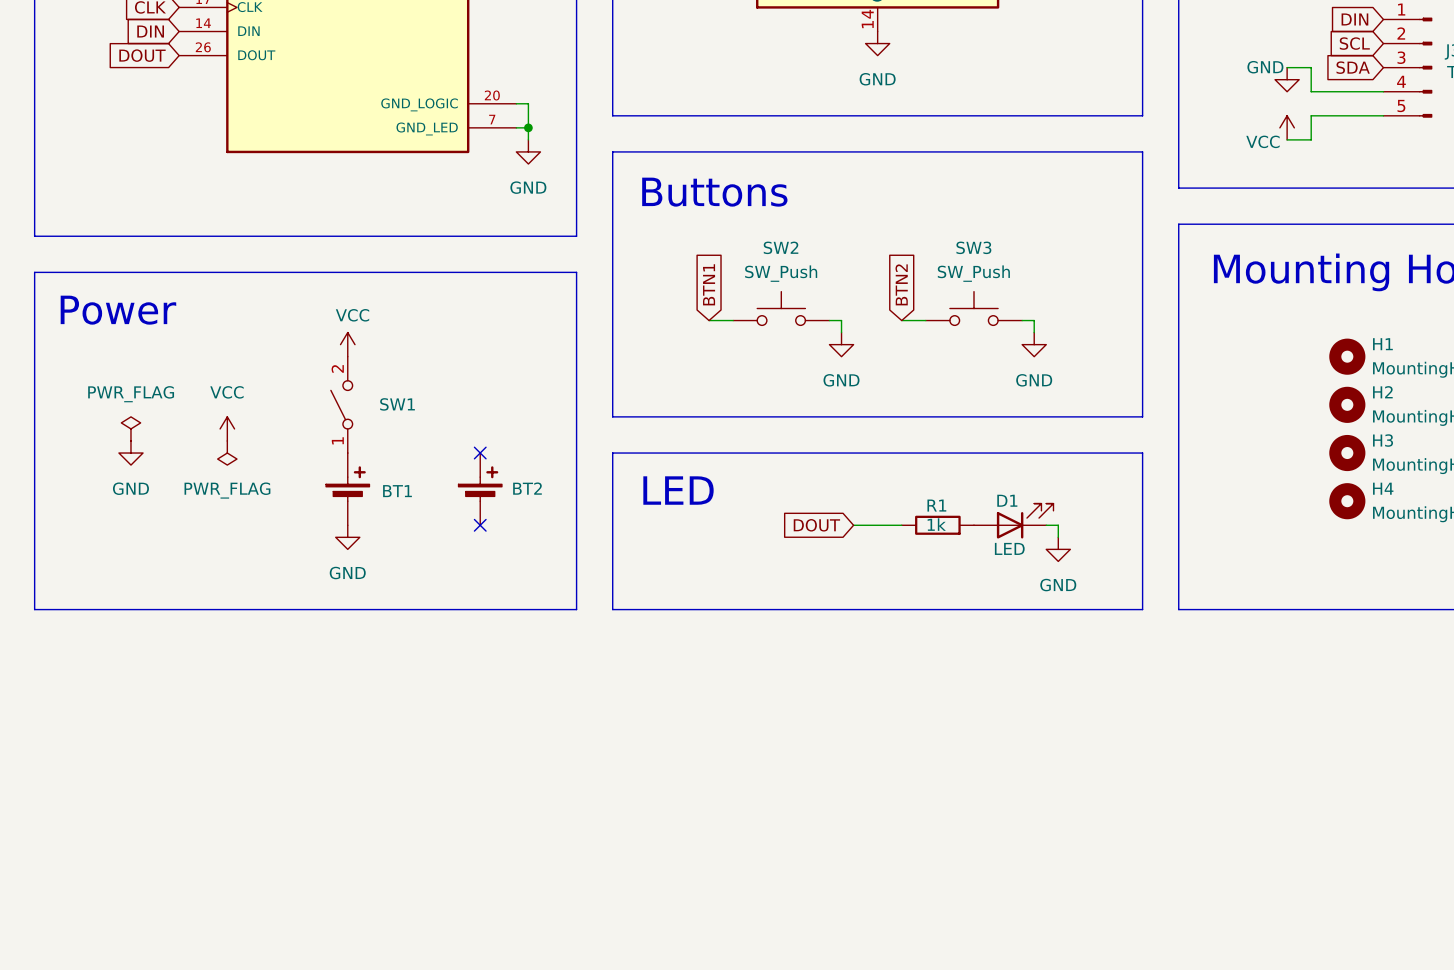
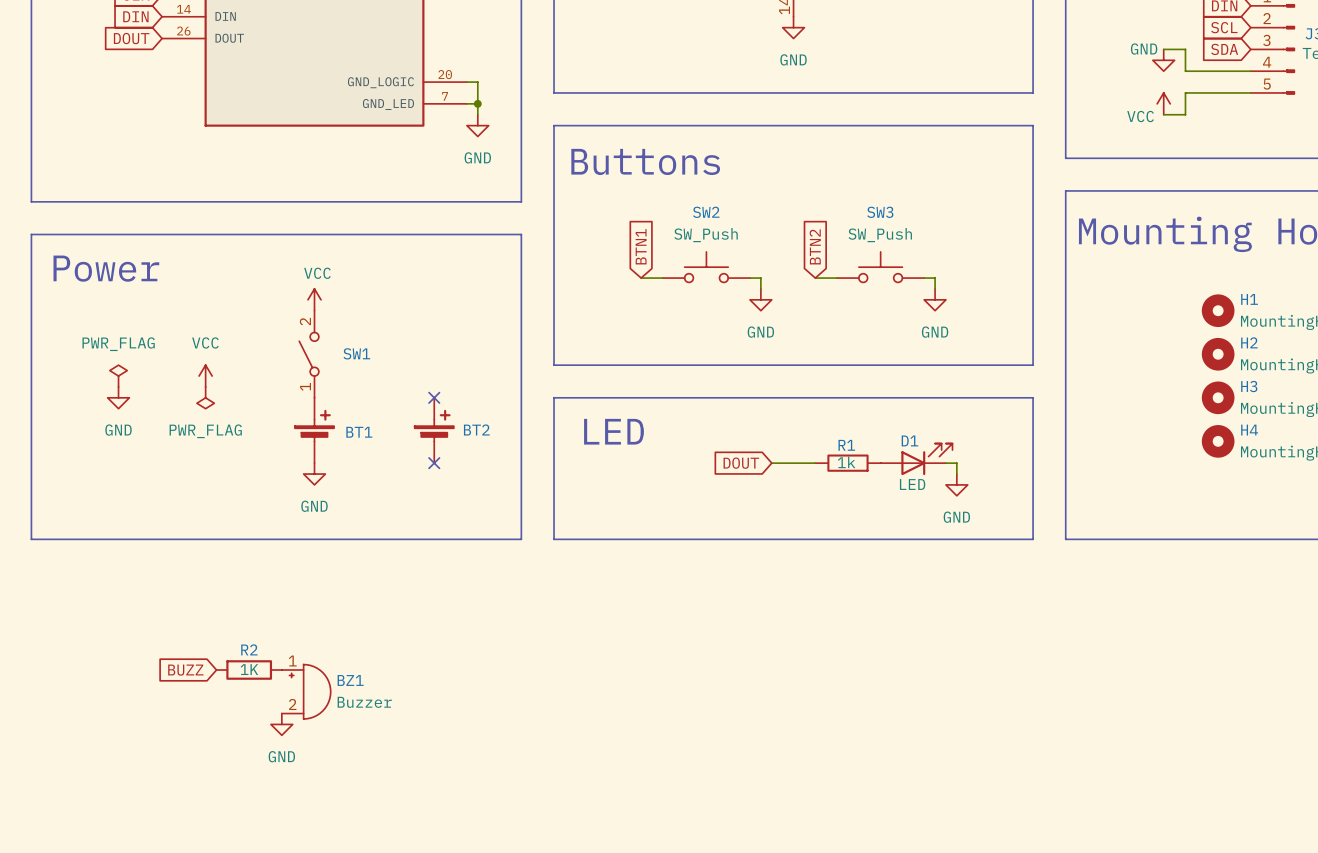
global label: none -> BUZZ (185, 670)
R2: none -> 1K (249, 670)
BZ1: none -> Buzzer (306, 691)
power symbol: none -> GND (281, 724)

